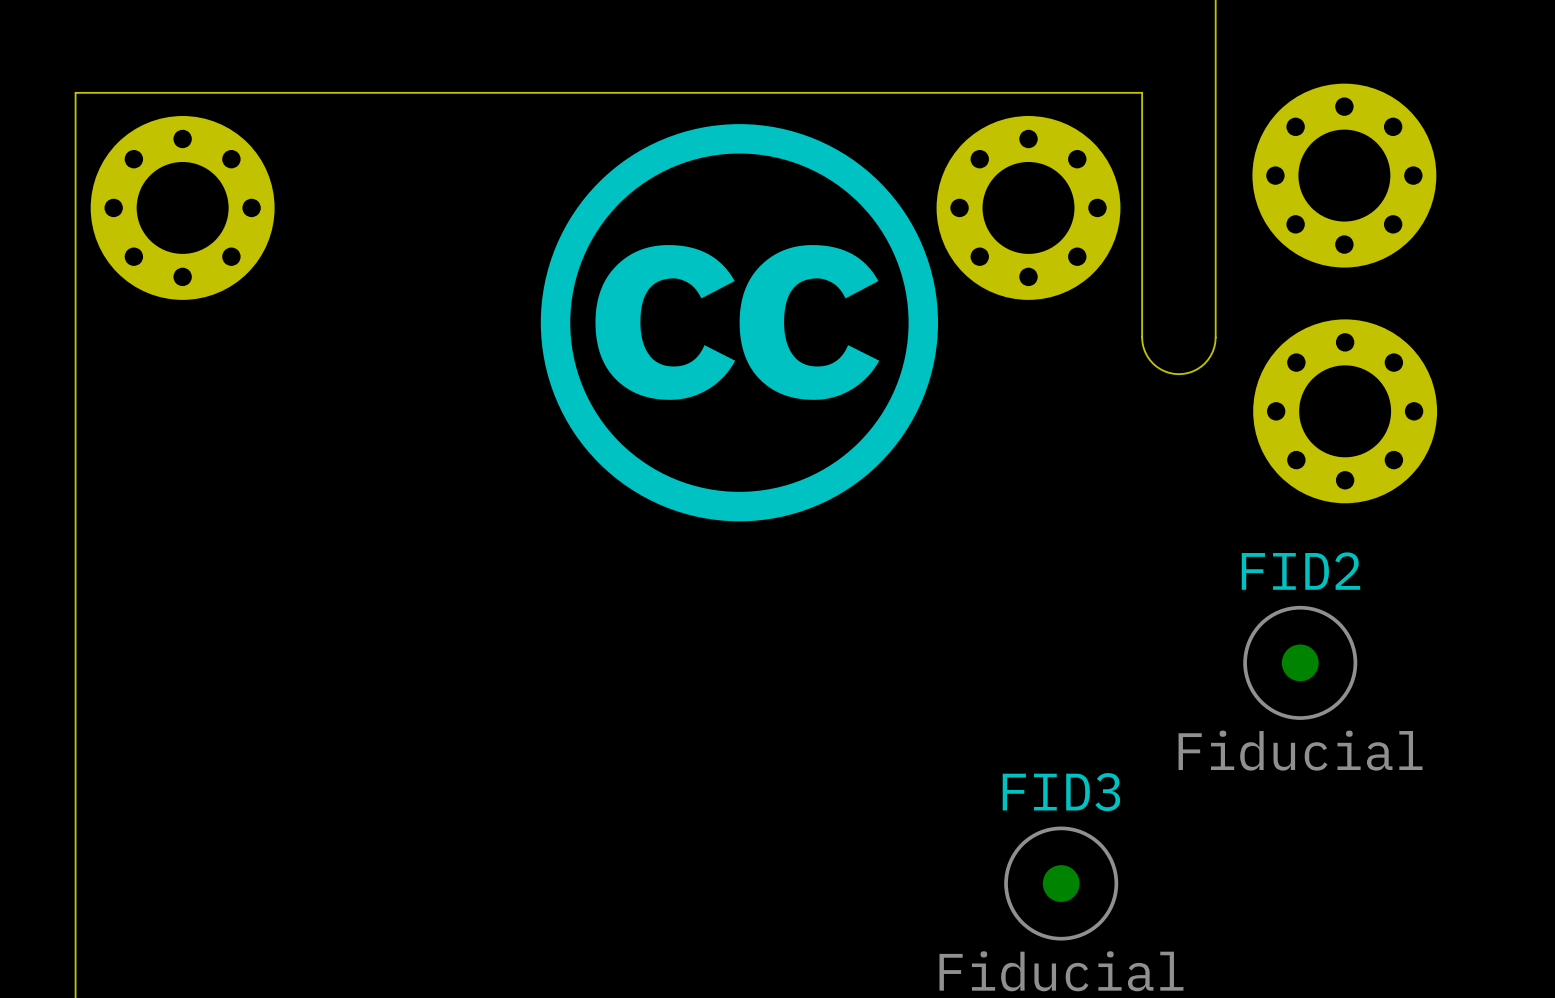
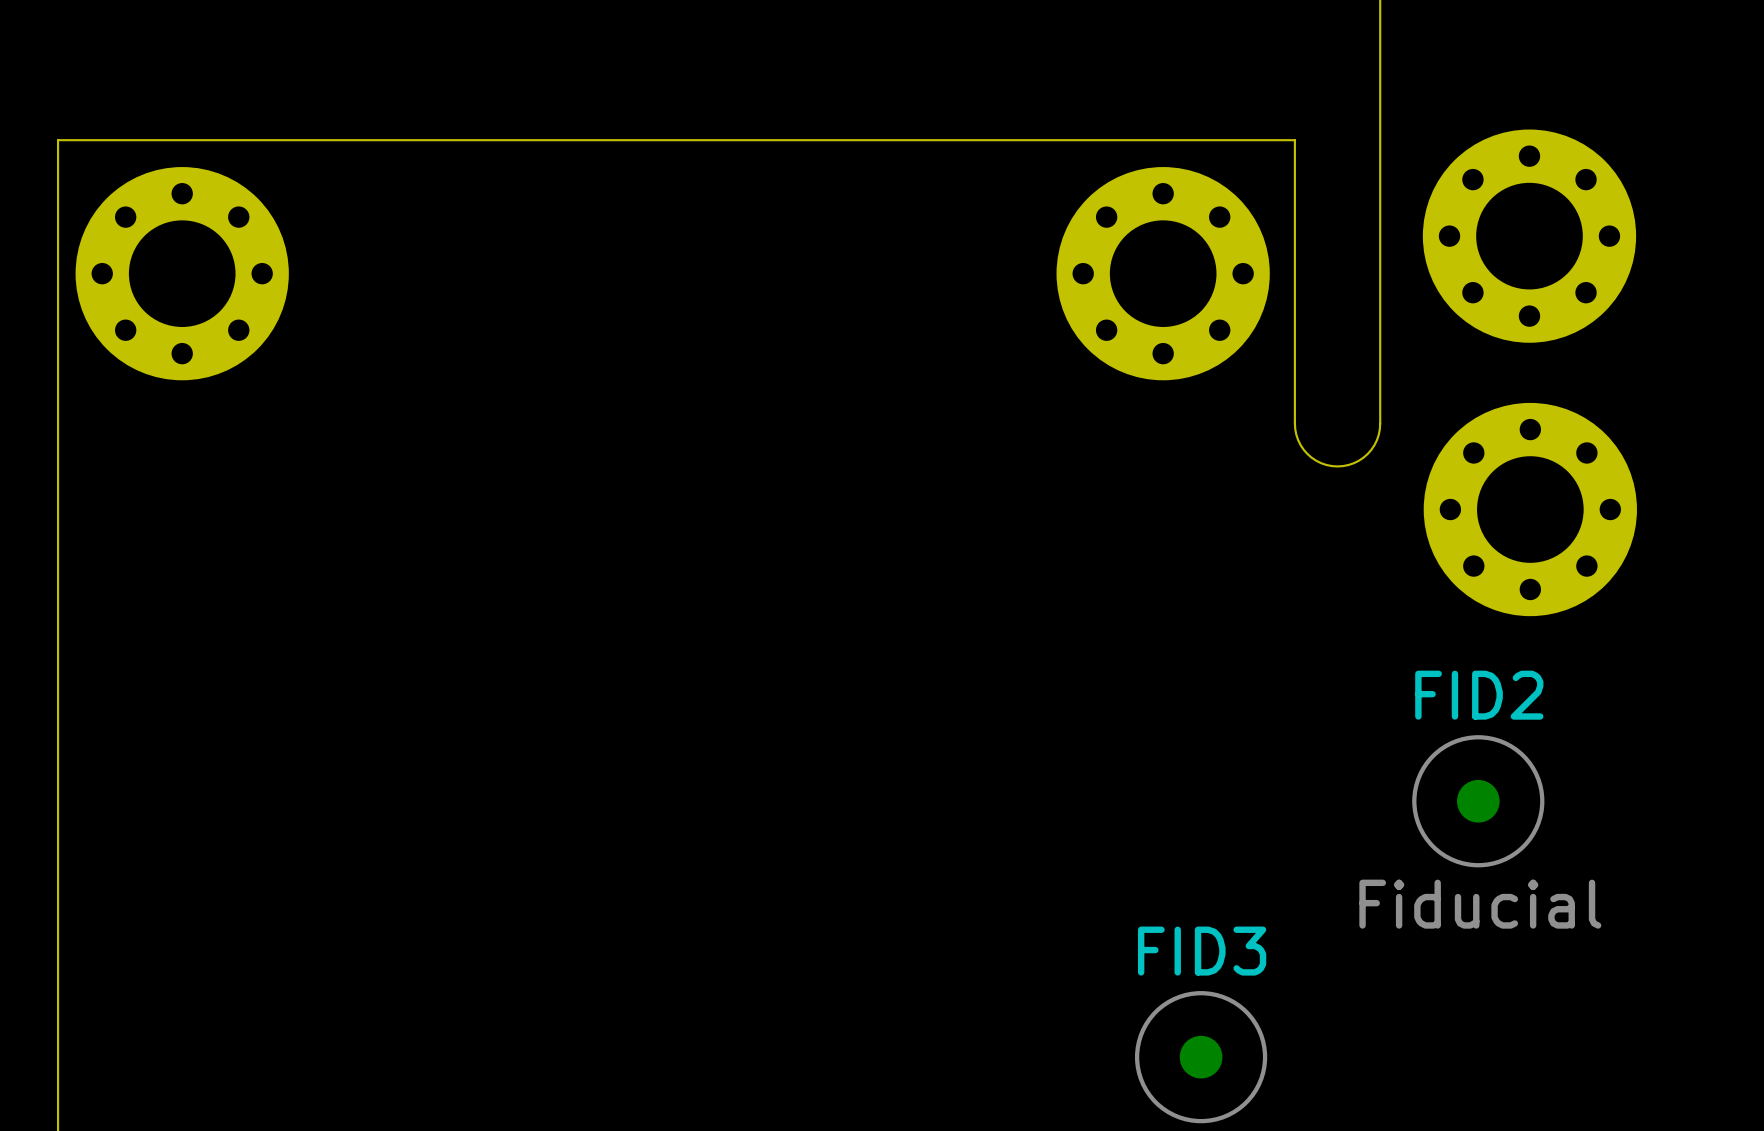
drawing: [540, 124, 939, 522] -> none

